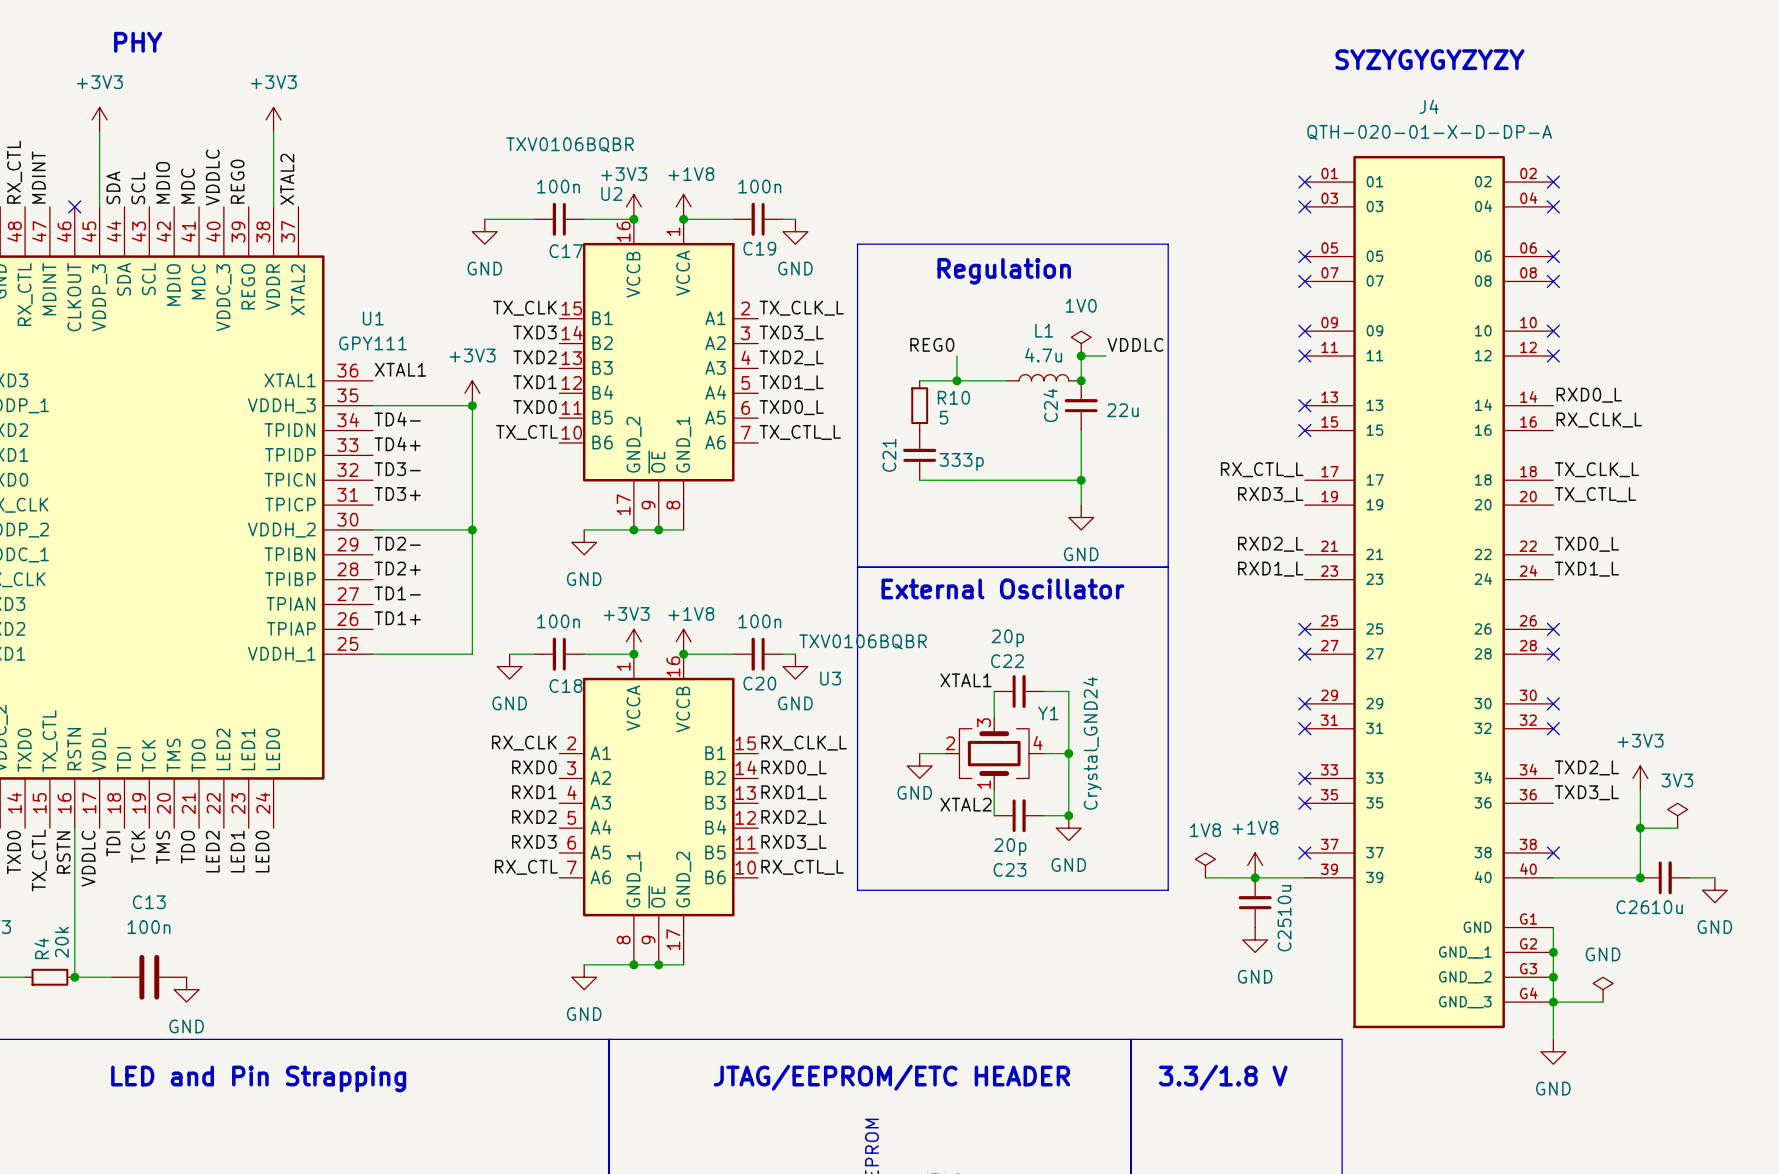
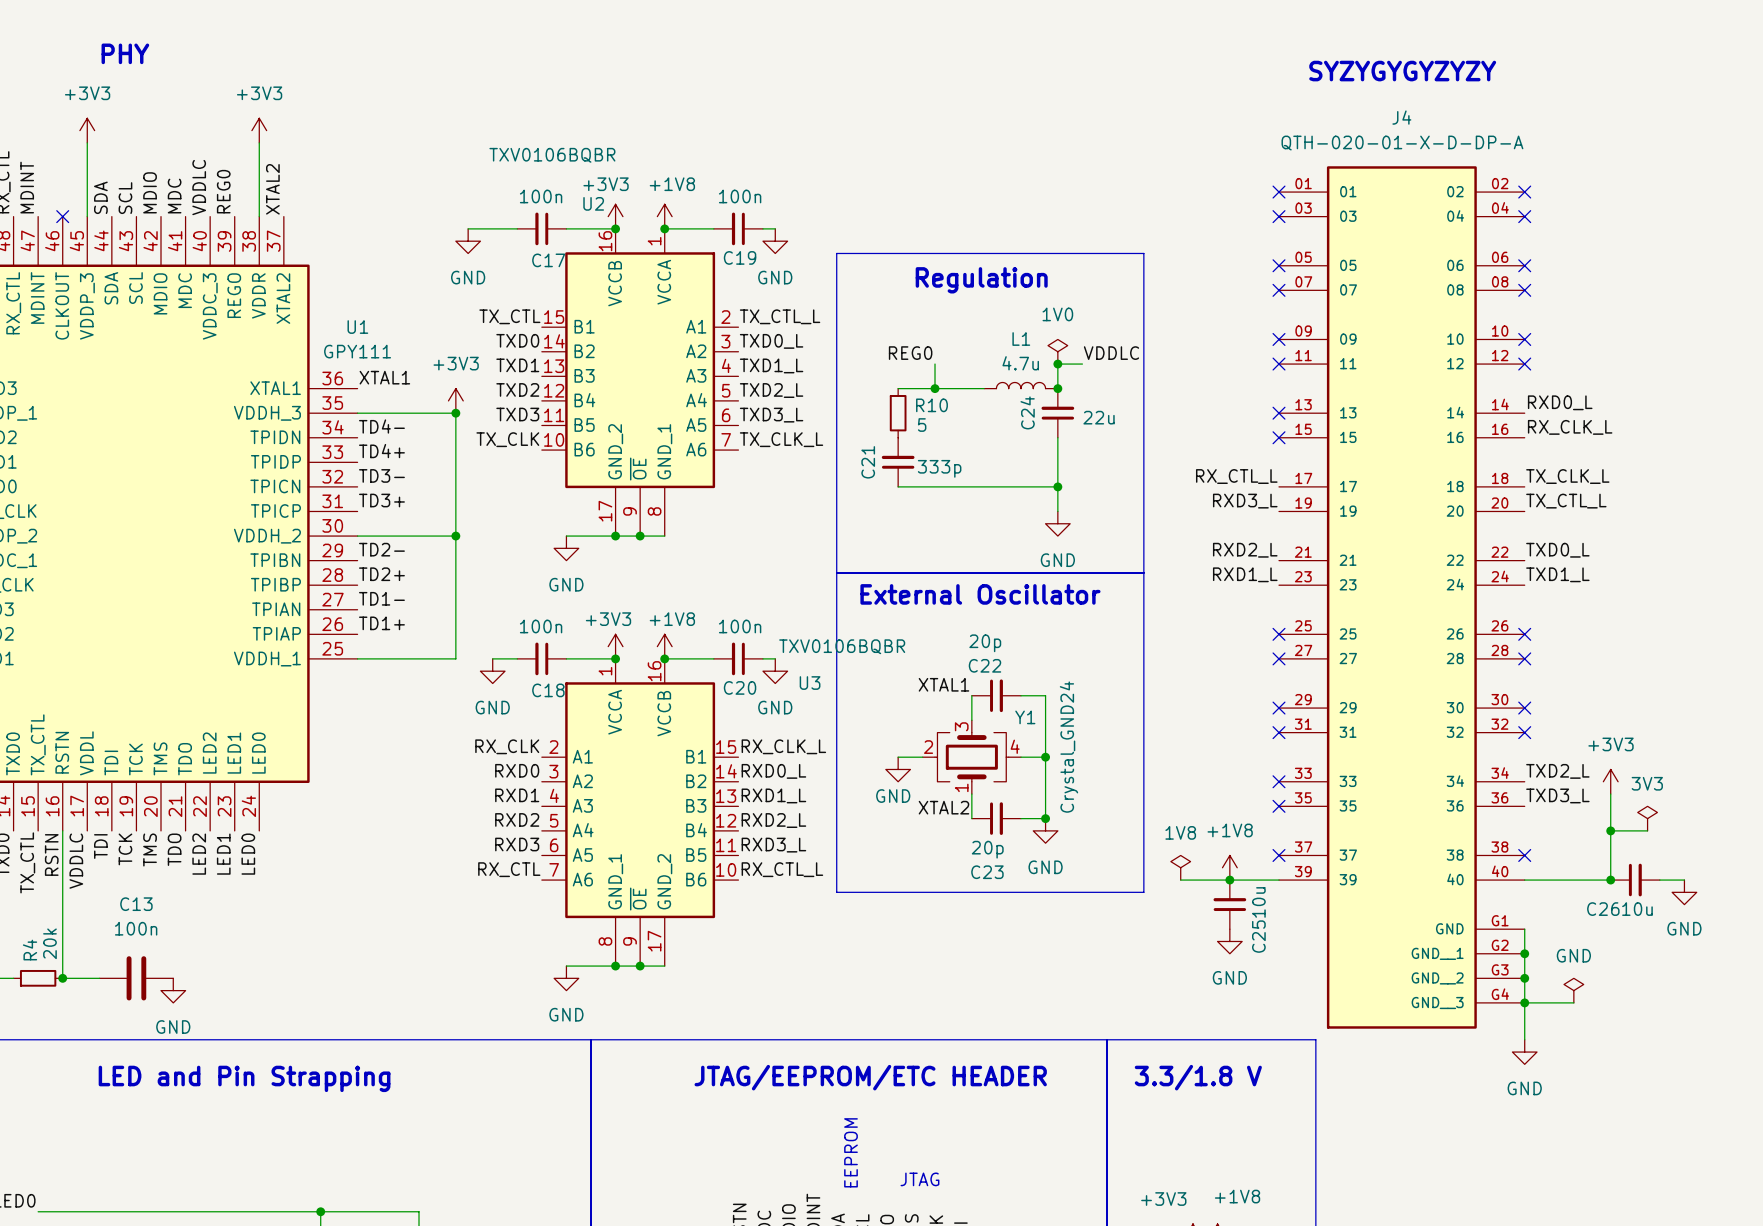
label: TX_CLK (524, 308) -> TX_CTL (509, 316)
label: TX_CLK_L (801, 308) -> TX_CTL_L (780, 316)
label: TXD3 (535, 332) -> TXD0 (517, 340)
label: TXD3_L (791, 333) -> TXD0_L (771, 341)
label: TXD2 (535, 357) -> TXD1 (517, 365)
label: TXD2_L (791, 357) -> TXD1_L (771, 365)
label: TXD1 (535, 382) -> TXD2 (517, 389)
label: TXD1_L (791, 382) -> TXD2_L (771, 390)
label: TXD0 (535, 407) -> TXD3 (517, 414)
label: TXD0_L (791, 407) -> TXD3_L (771, 415)
label: TX_CTL (527, 432) -> TX_CLK (507, 439)
label: TX_CTL_L (800, 432) -> TX_CLK_L (781, 439)

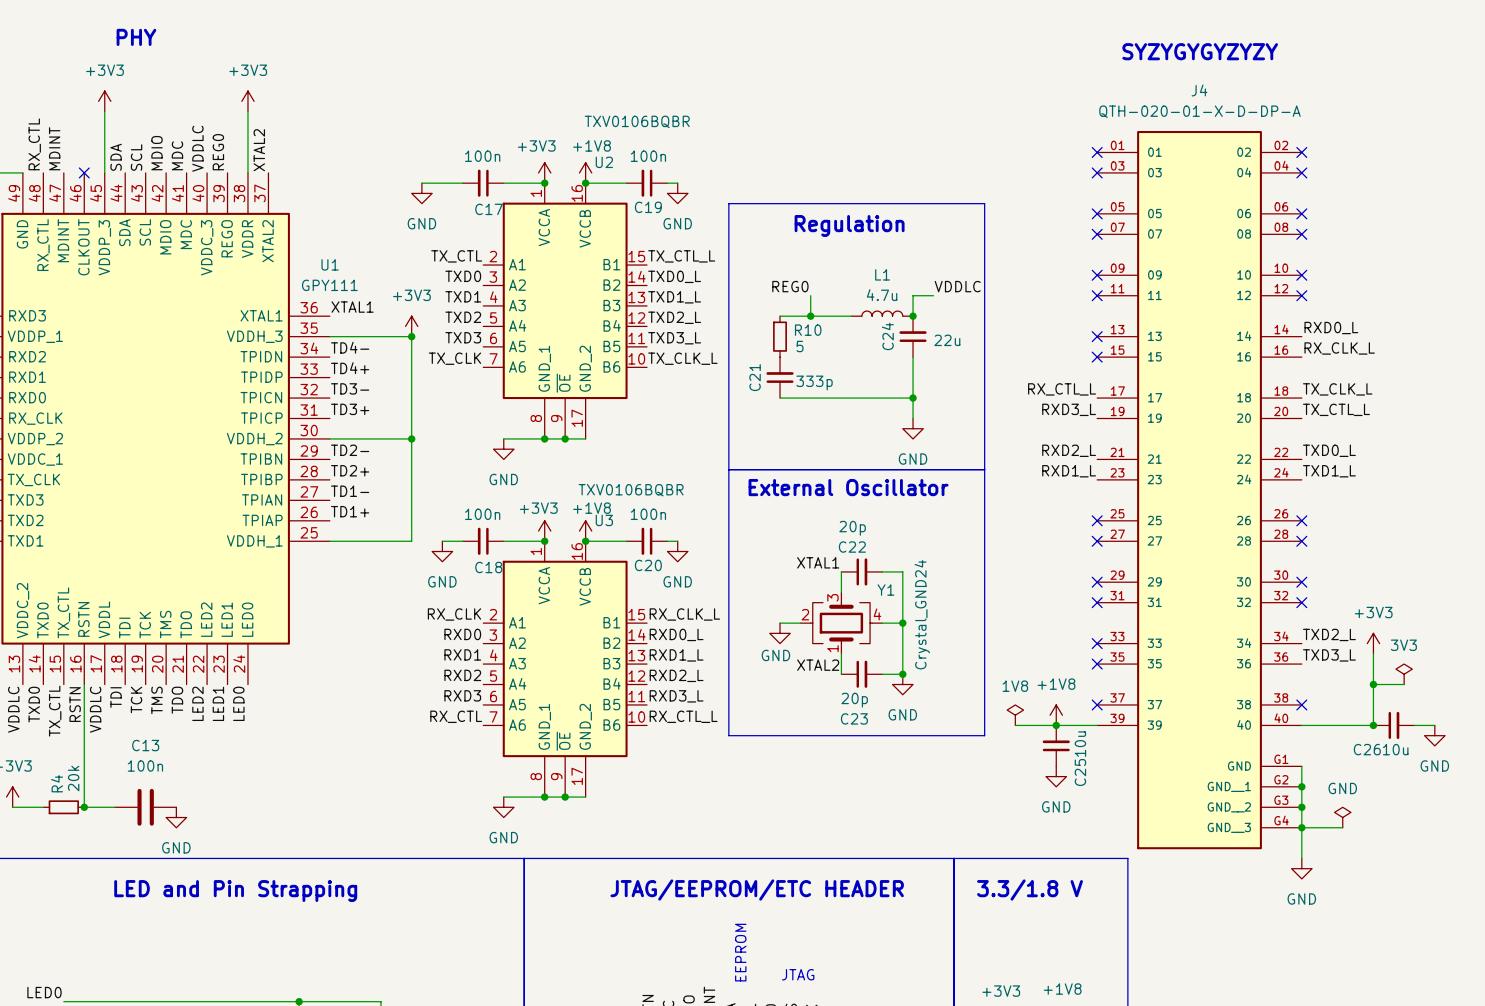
power symbol: 1V0 (1057, 351) -> none
junction: (1057, 364) -> none
U2 flip: as is (640, 370) -> left-right (565, 300)
U3 value position: TXV0106BQBR (842, 646) -> TXV0106BQBR (631, 490)
U3 name position: U3 (810, 683) -> U3 (604, 520)

